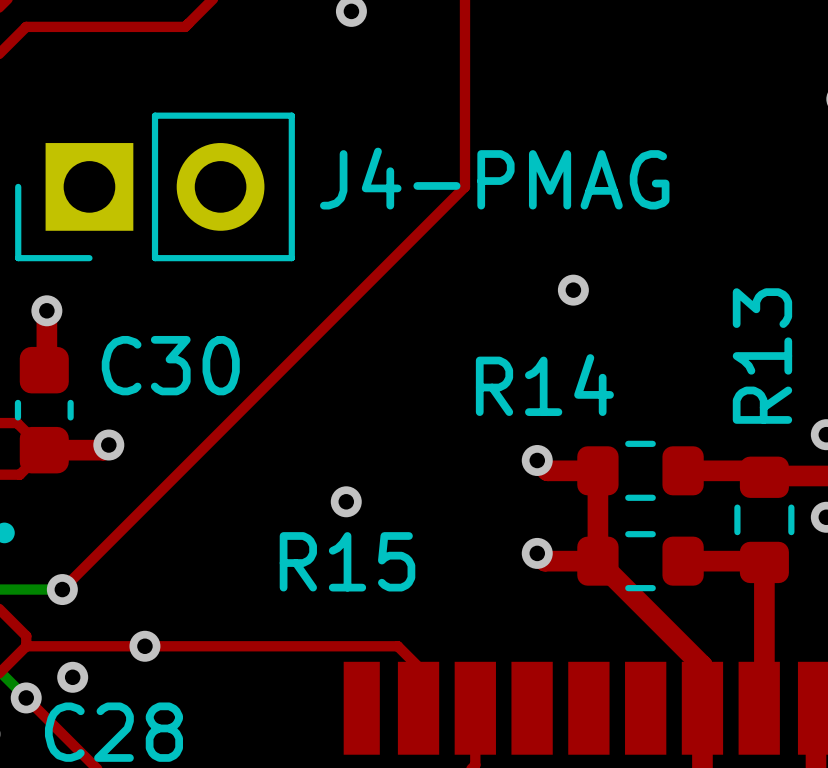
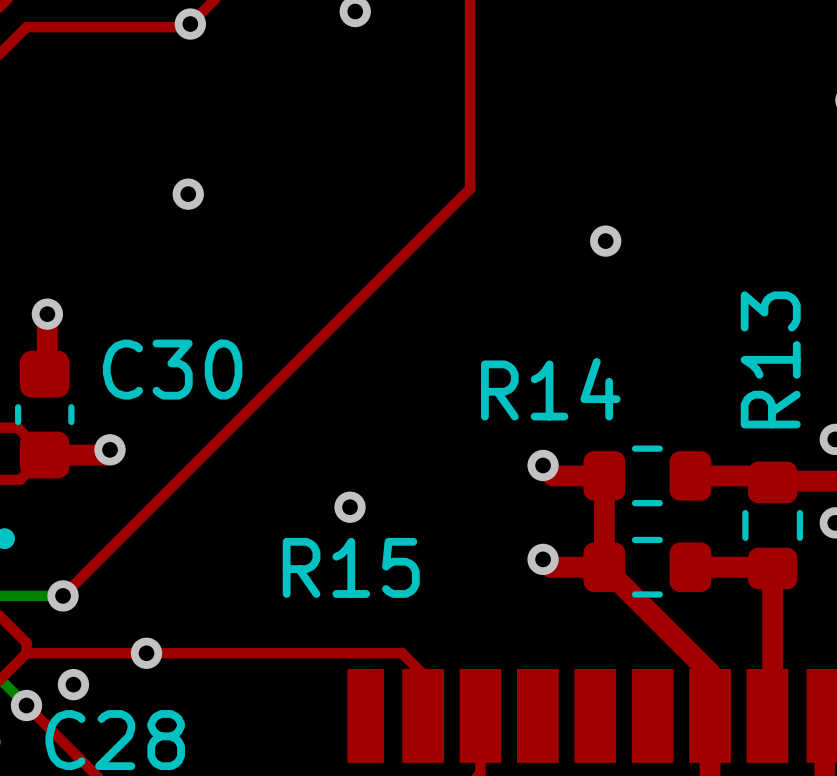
via: none -> (190, 24)
J4-PMAG: (155, 186) -> none
via: none -> (188, 194)
via position: (573, 290) -> (605, 241)

